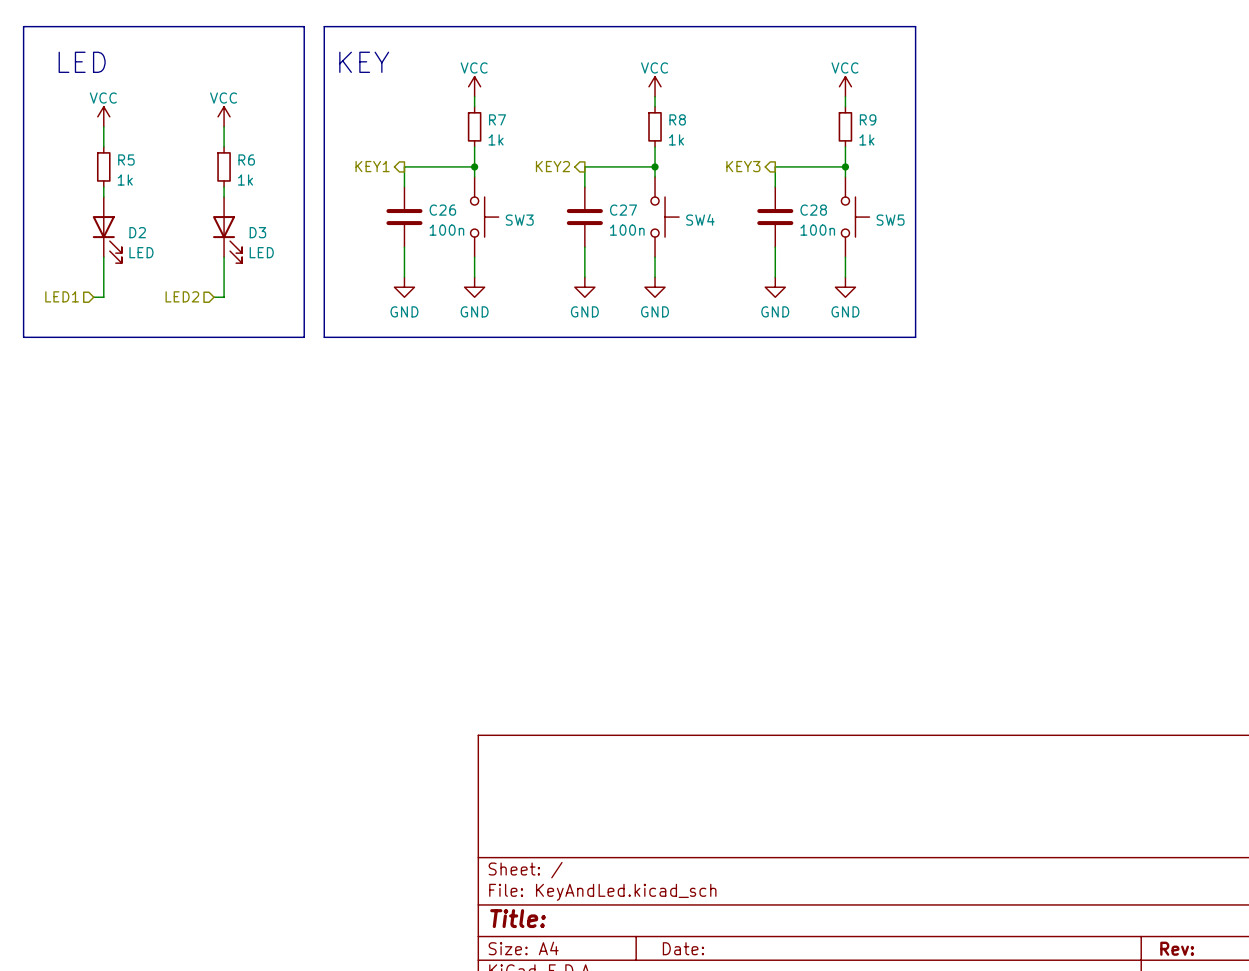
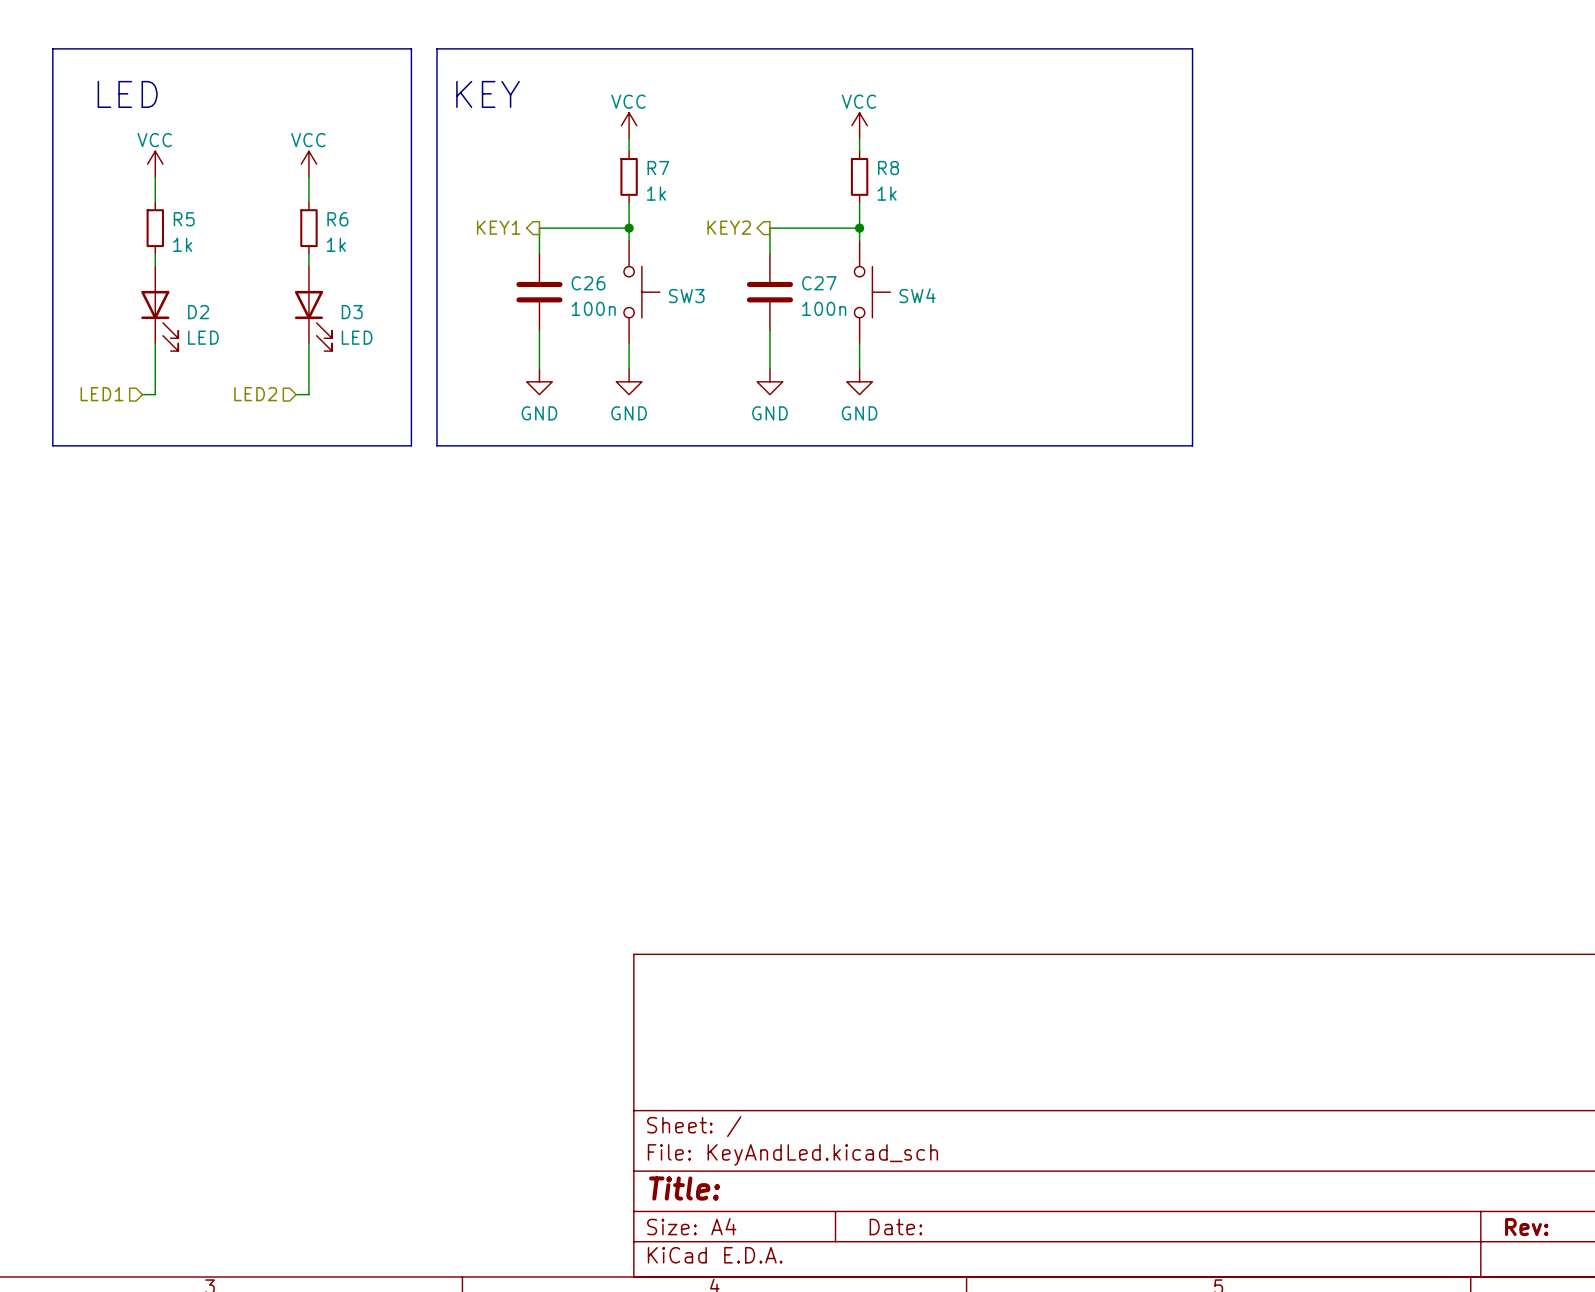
power symbol: VCC (845, 86) -> none
wire: (845, 96) (845, 106) -> none
R9: 1k (845, 126) -> none
wire: (845, 146) (845, 176) -> none
hierarchical label: KEY3 (743, 166) -> none
wire: (845, 166) (775, 166) (775, 186) -> none
junction: (845, 166) -> none
C28: 100n (775, 217) -> none
SW5: (855, 217) -> none
wire: (775, 247) (775, 277) -> none
wire: (845, 257) (845, 277) -> none
power symbol: GND (775, 287) -> none
power symbol: GND (845, 287) -> none

